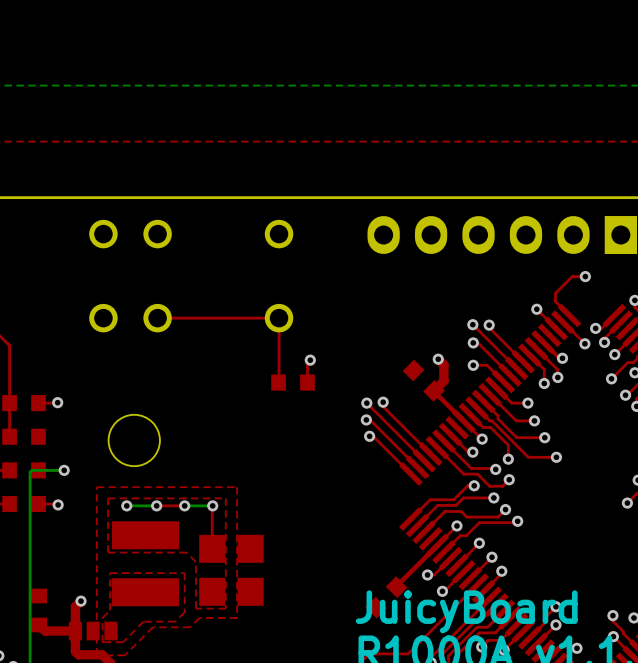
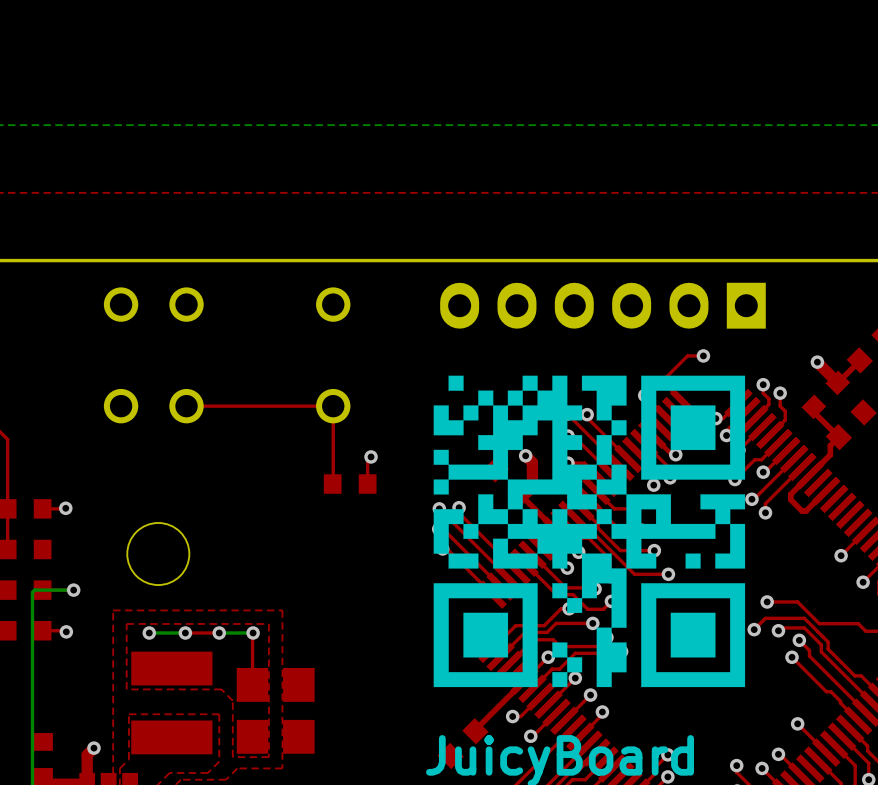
drawing: none -> [433, 375, 746, 688]

